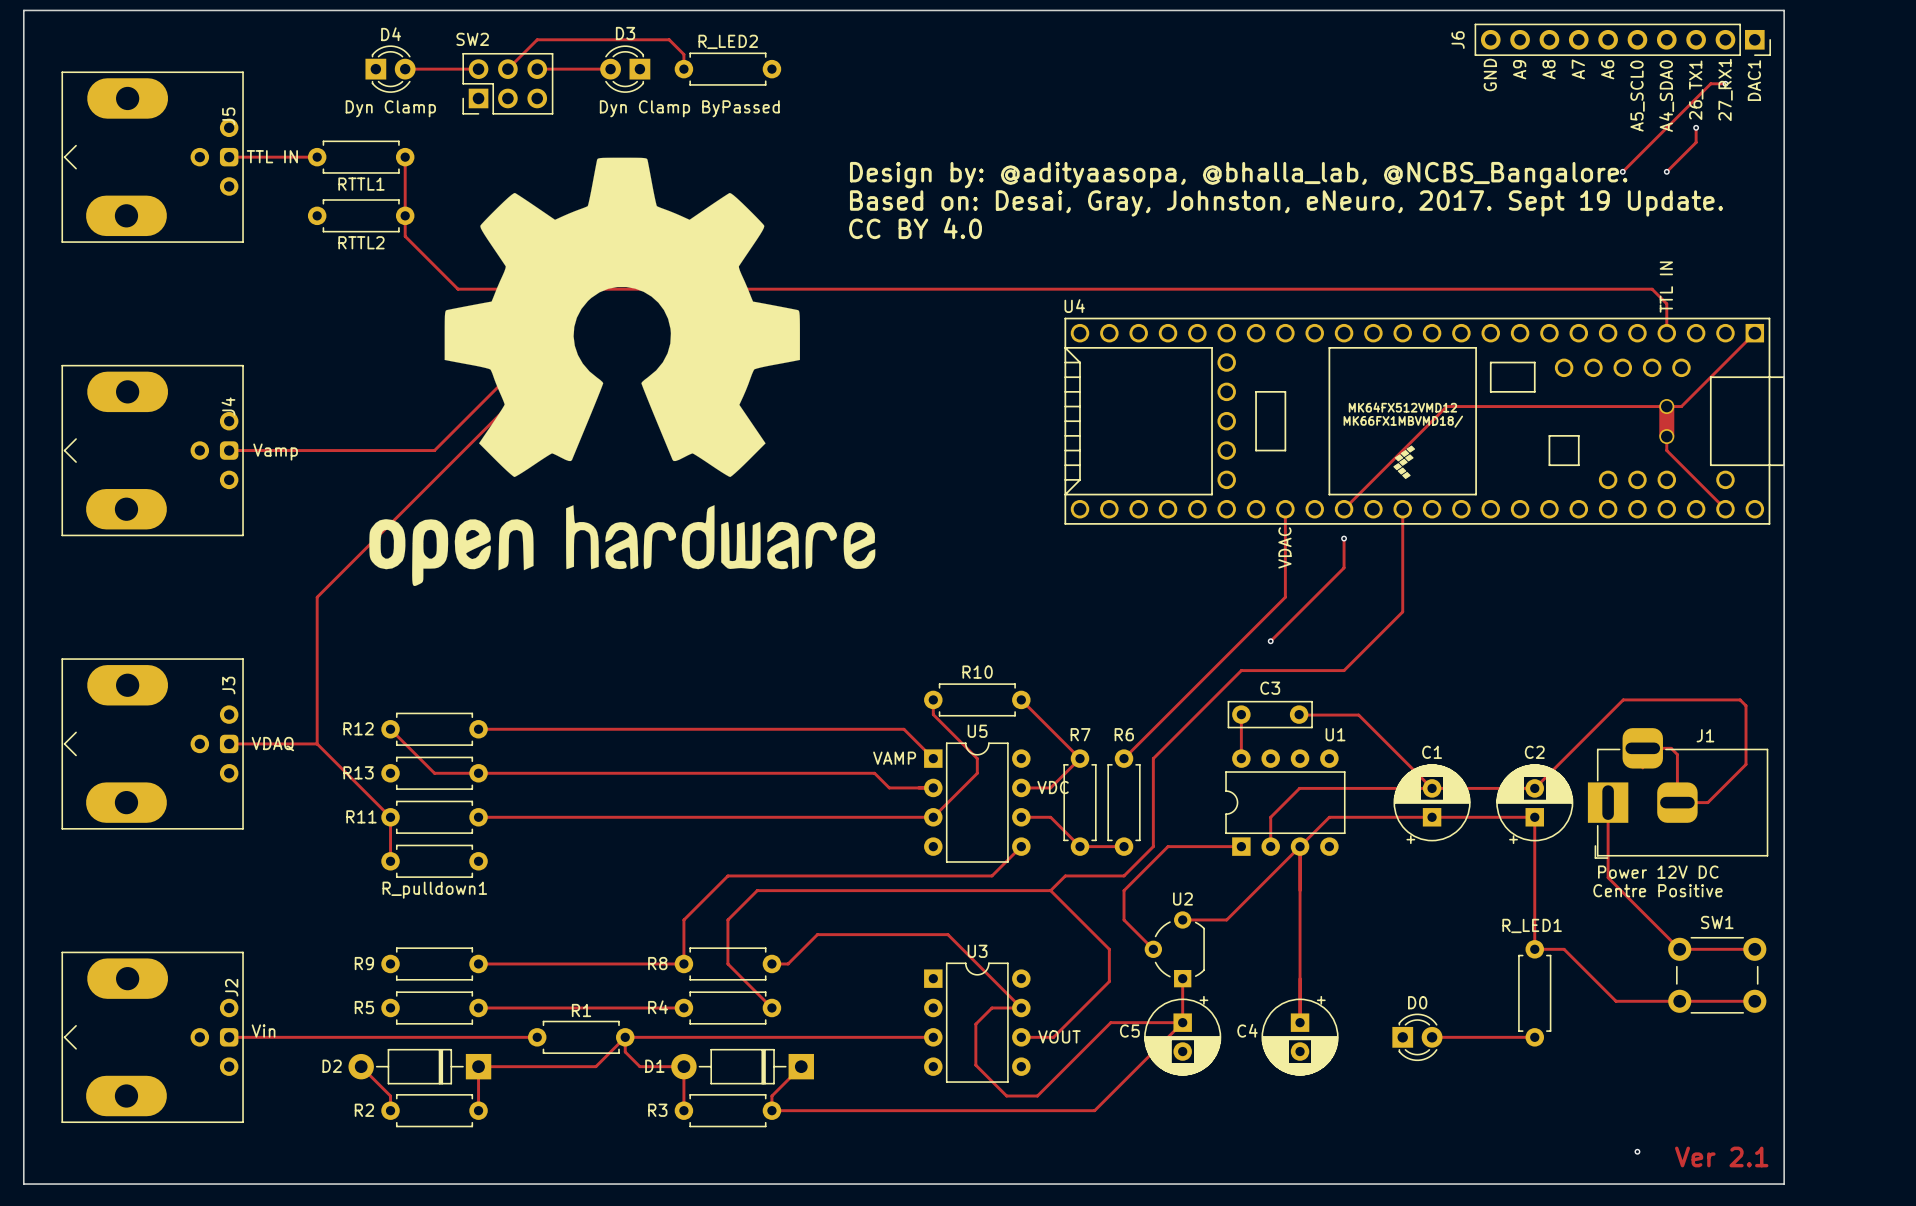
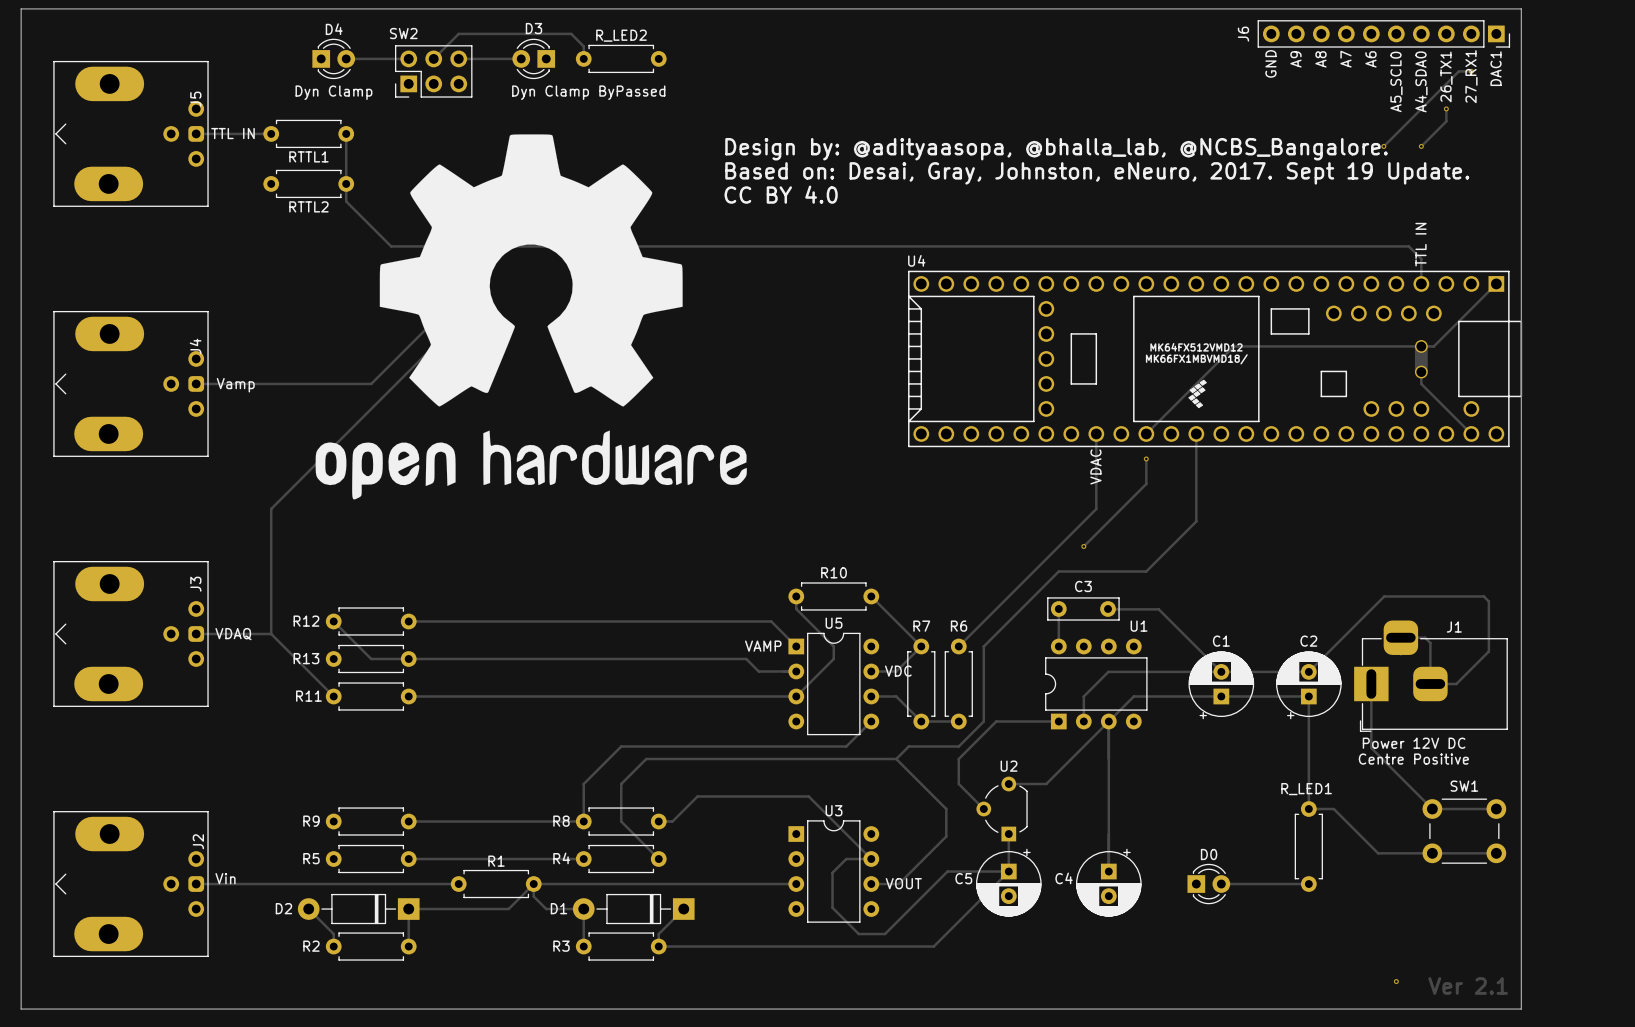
track: (390, 817) (390, 861) -> none
R_pulldown1: (434, 861) -> none

